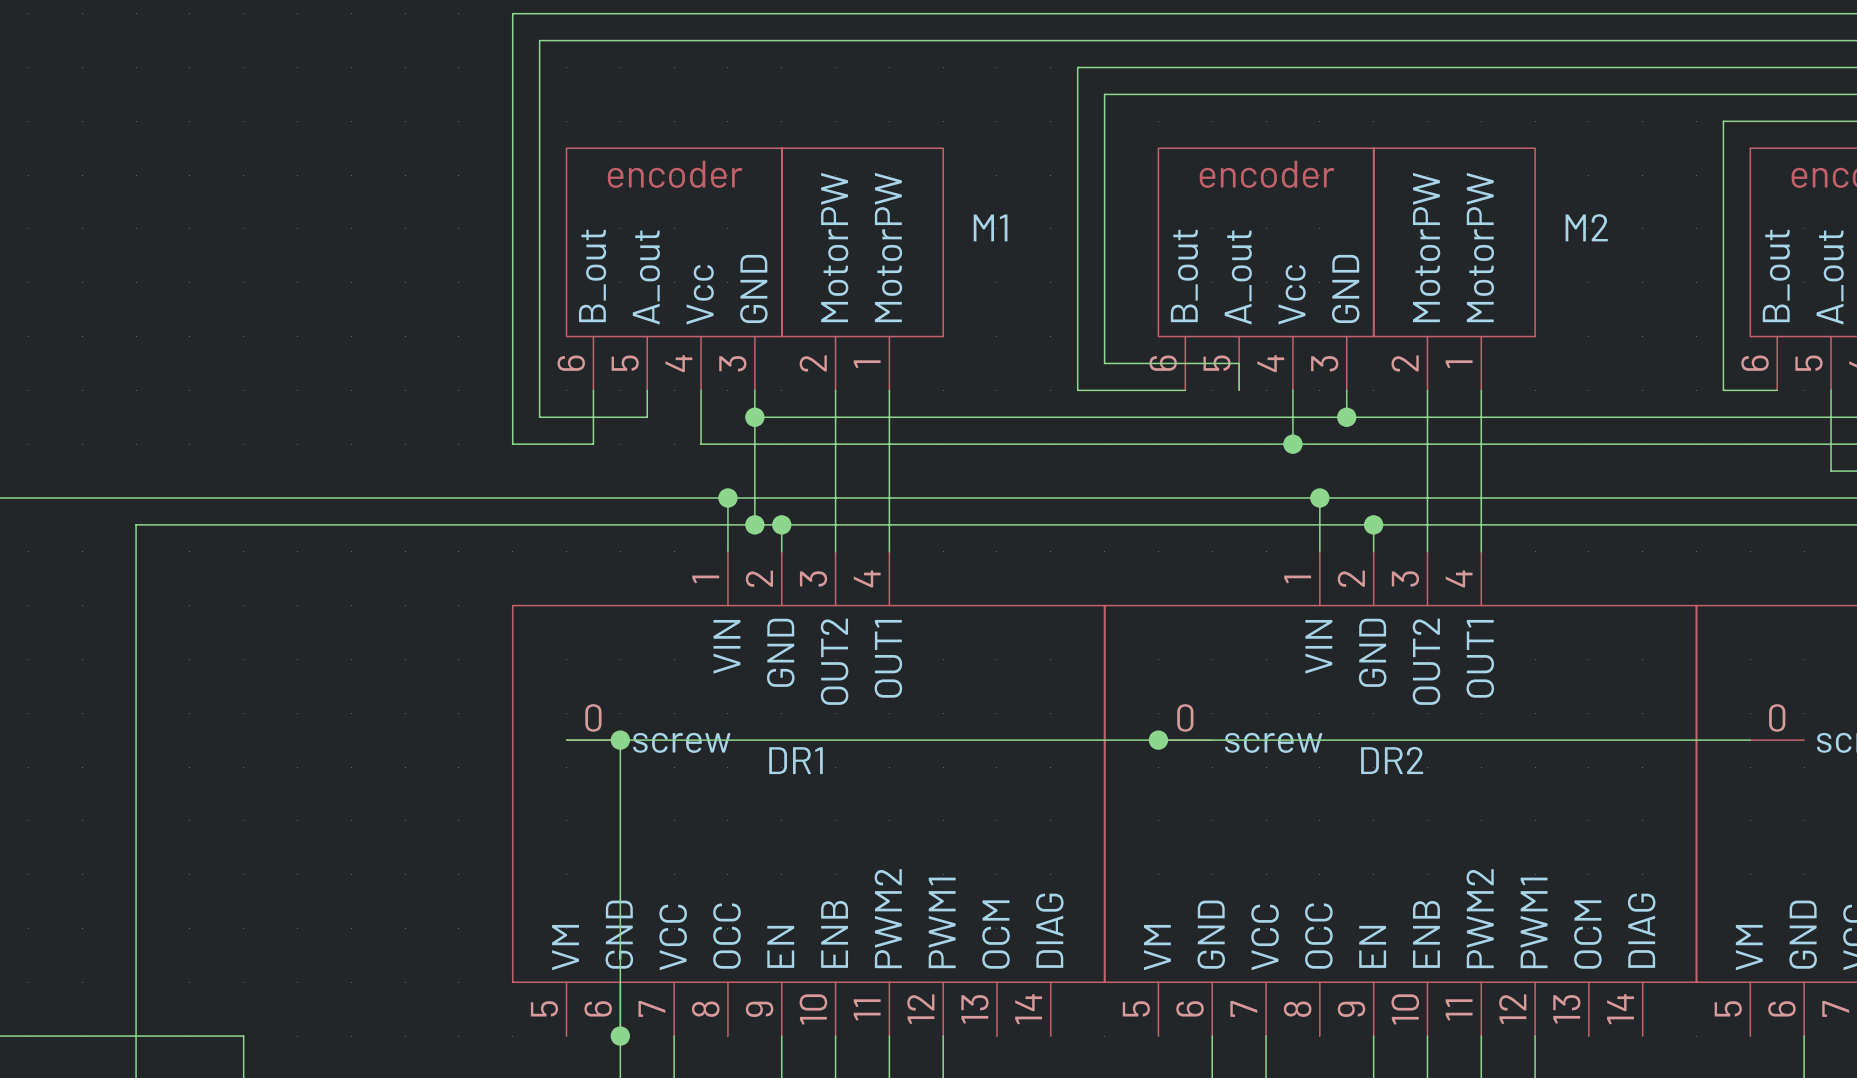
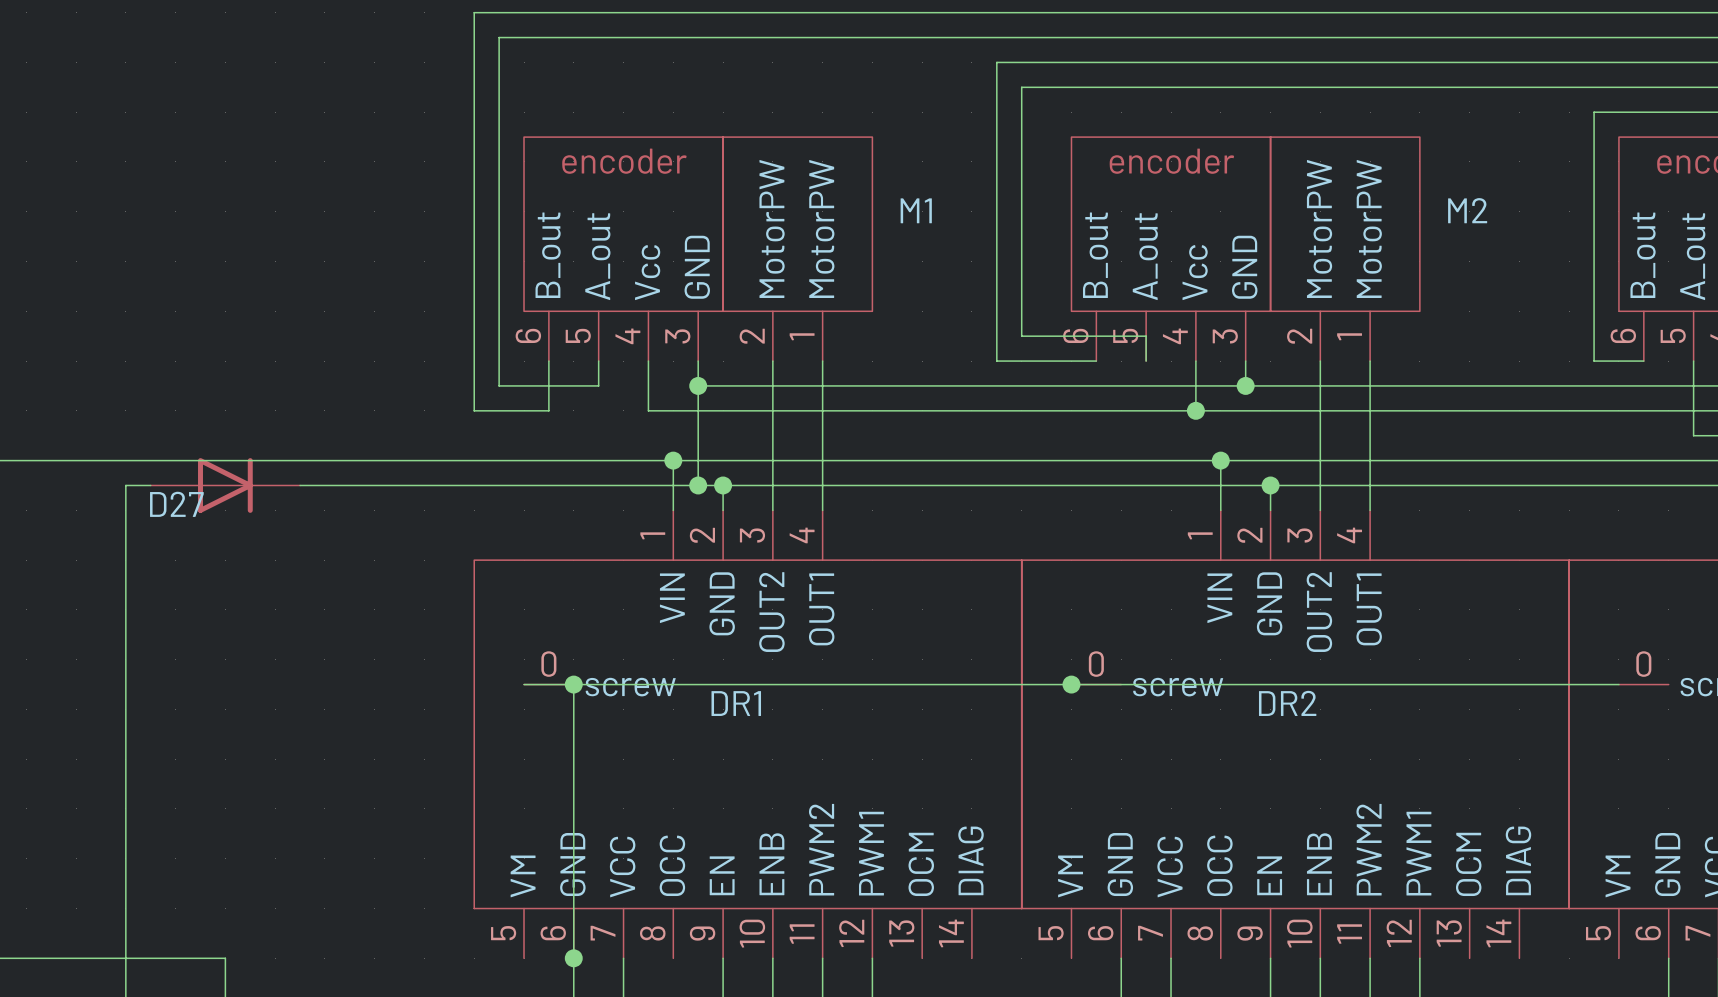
D27: none -> (225, 485)

